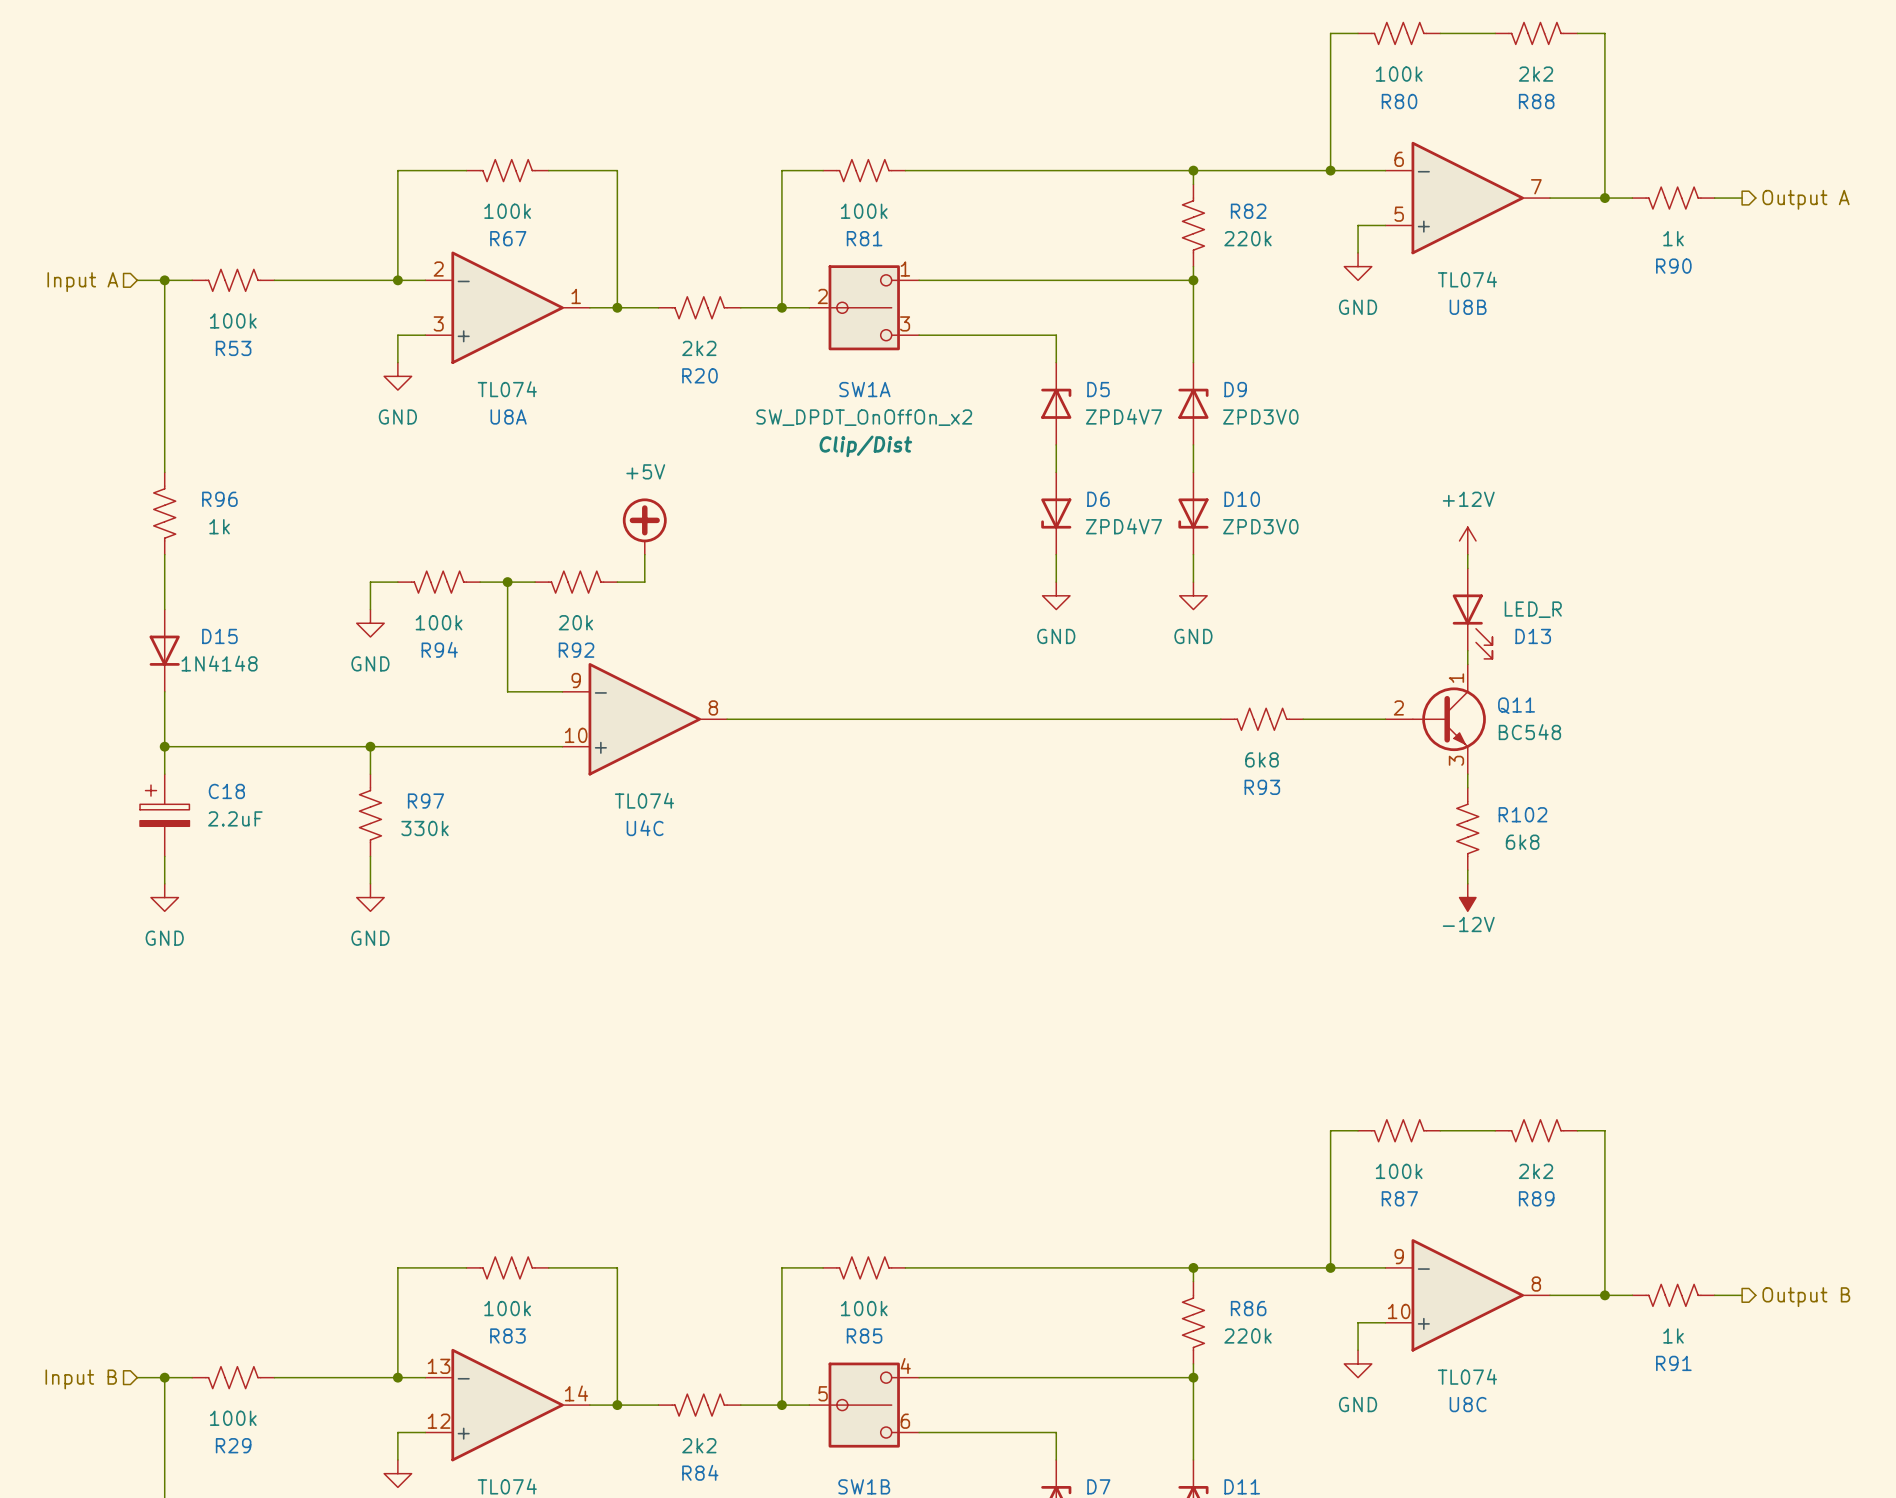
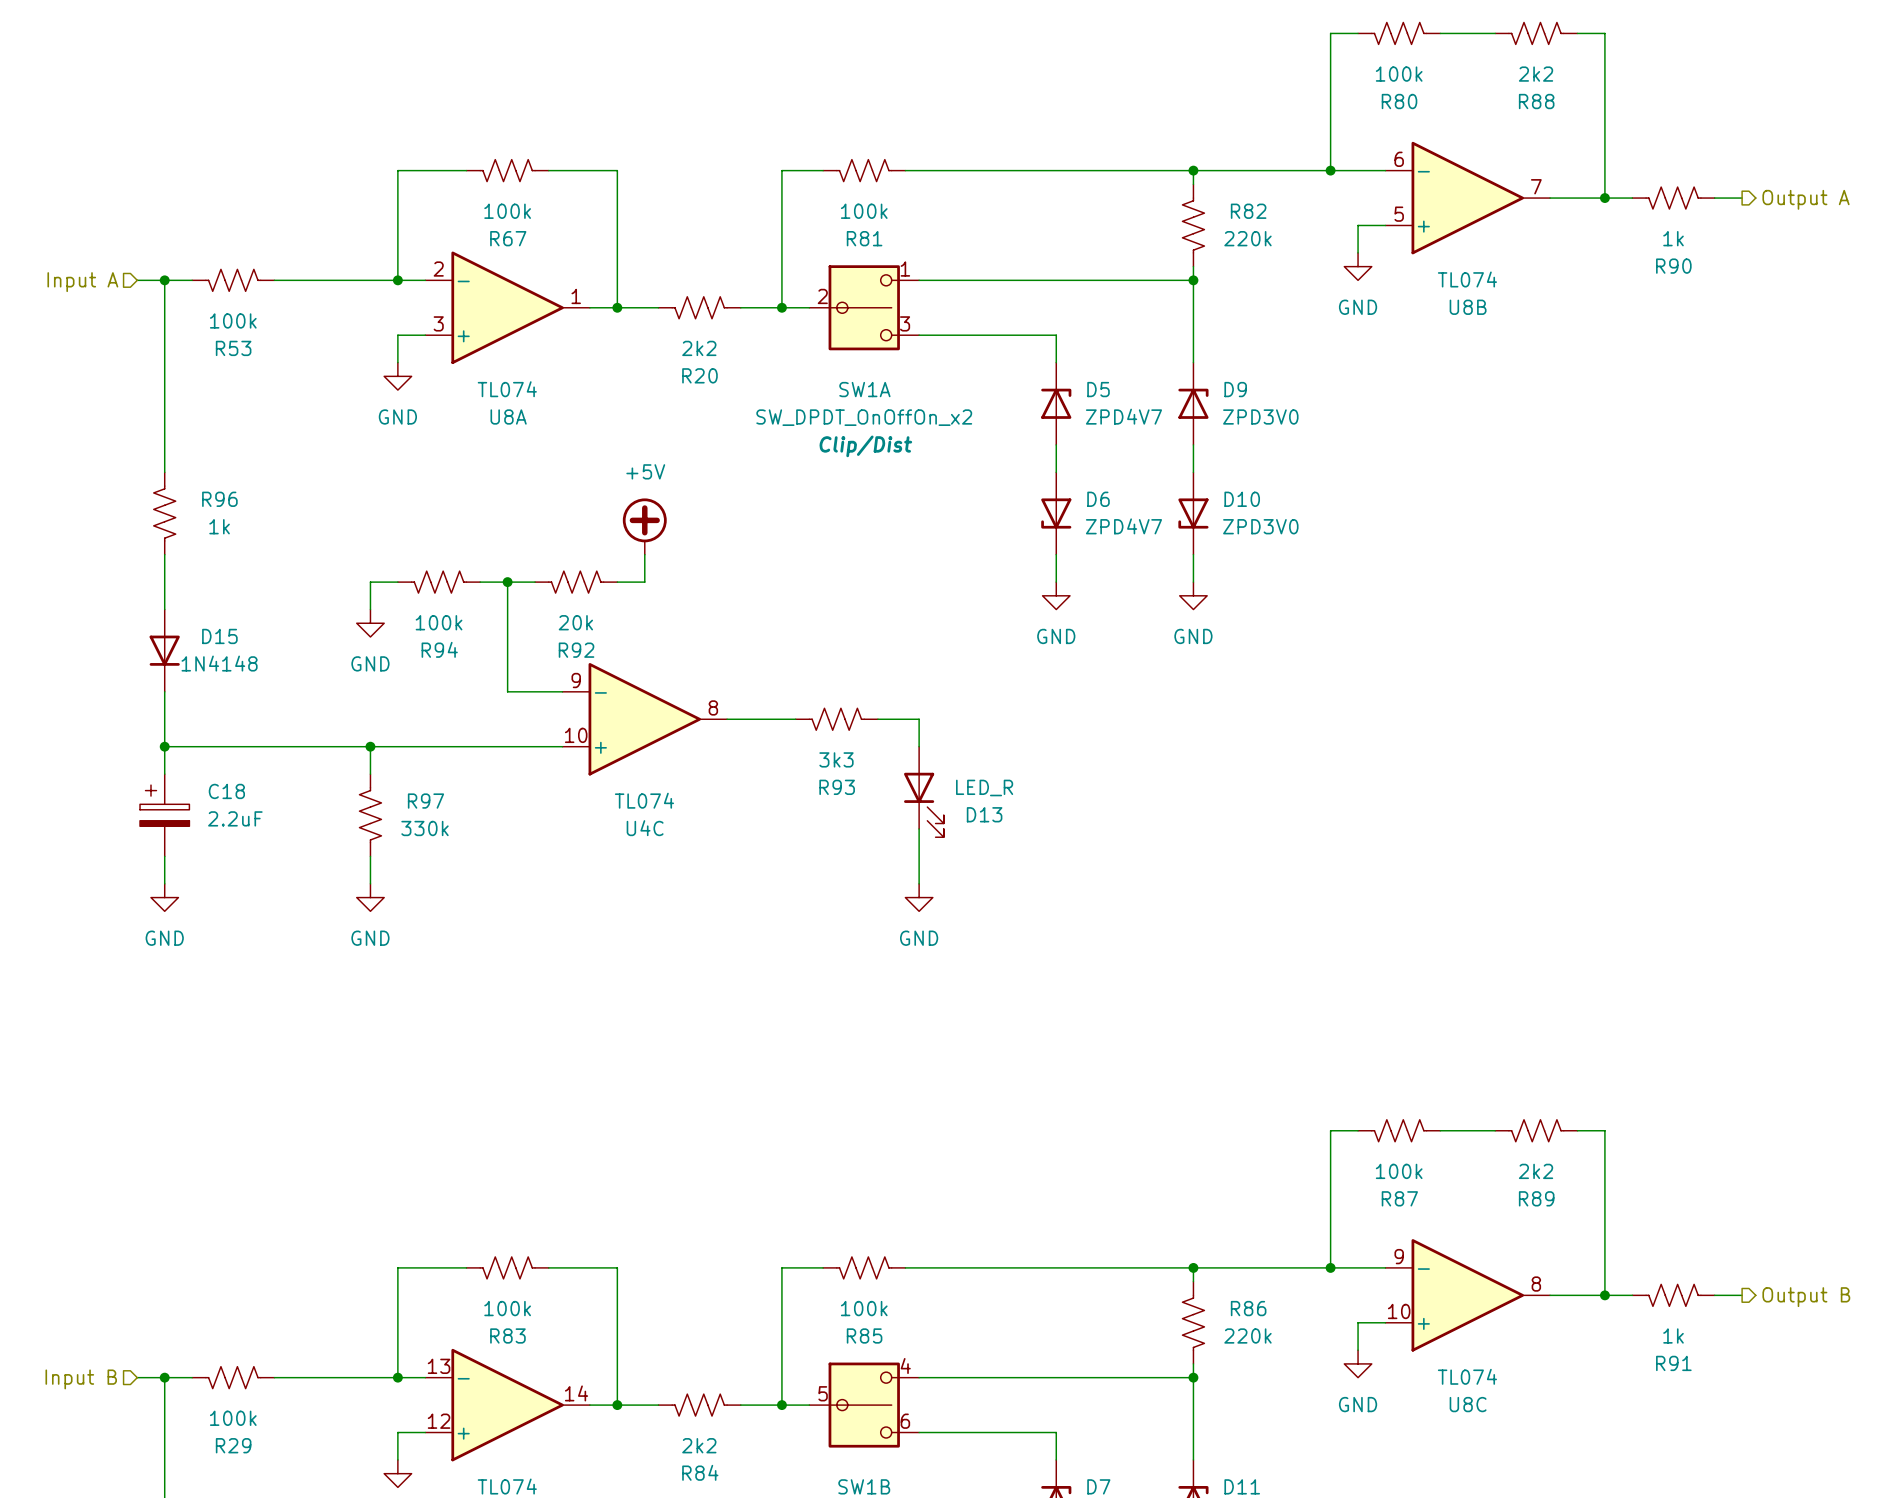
power symbol: +12V (1467, 540) -> none
wire: (1467, 554) (1467, 568) -> none
D13 position: (1472, 613) -> (923, 791)
wire: (1467, 650) (1467, 664) -> none
wire: (919, 719) (1220, 719) -> (919, 719) (919, 746)
R93 position: (1262, 719) -> (836, 719)
wire: (1303, 719) (1385, 719) -> none
Q11: BC548 (1435, 719) -> none
R93 value: 6k8 (1262, 759) -> 3k3 (836, 759)
wire: (1467, 774) (1467, 787) -> none
wire: none -> (919, 828) (919, 883)
R102: 6k8 (1467, 828) -> none
wire: (1467, 870) (1467, 883) -> none
power symbol: none -> GND (919, 897)
power symbol: -12V (1467, 897) -> none

